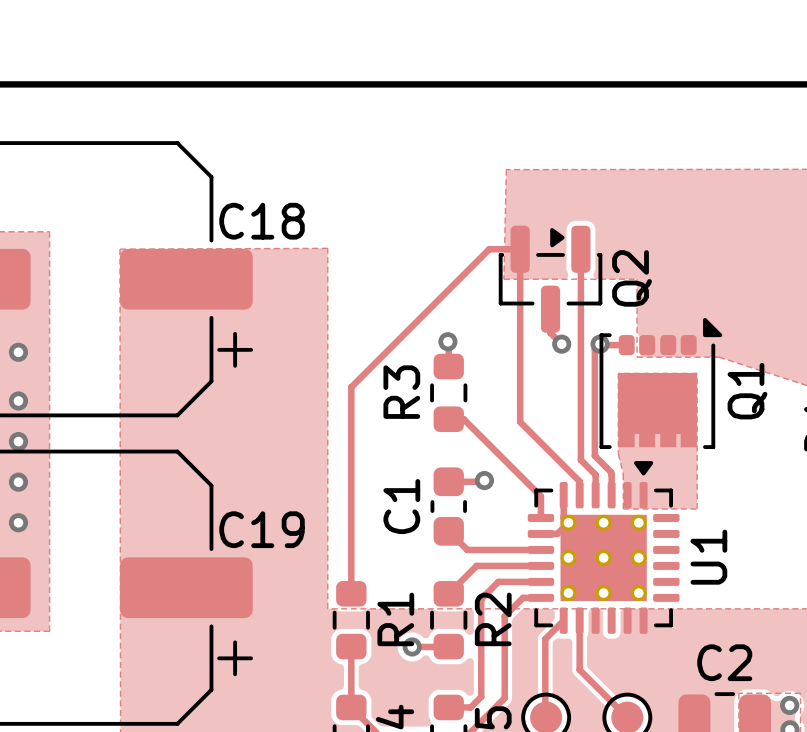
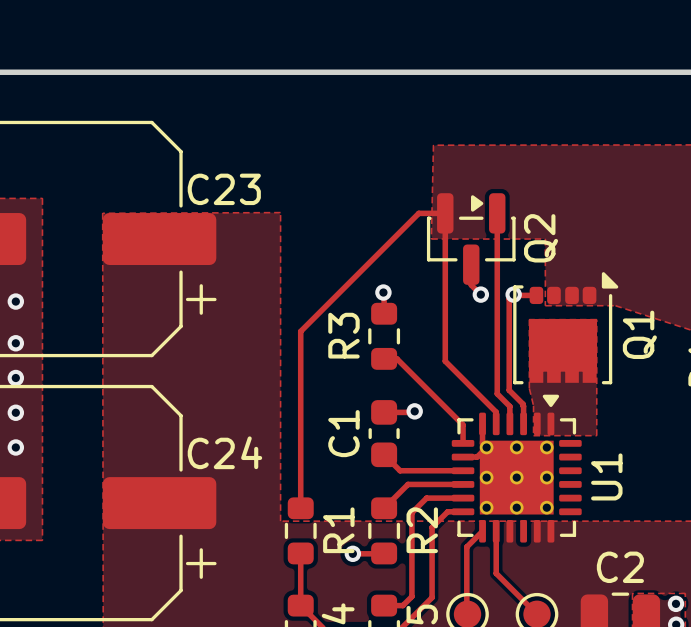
C18 name: C18 (262, 221) -> C23 (224, 189)
C19 name: C19 (262, 529) -> C24 (224, 452)

